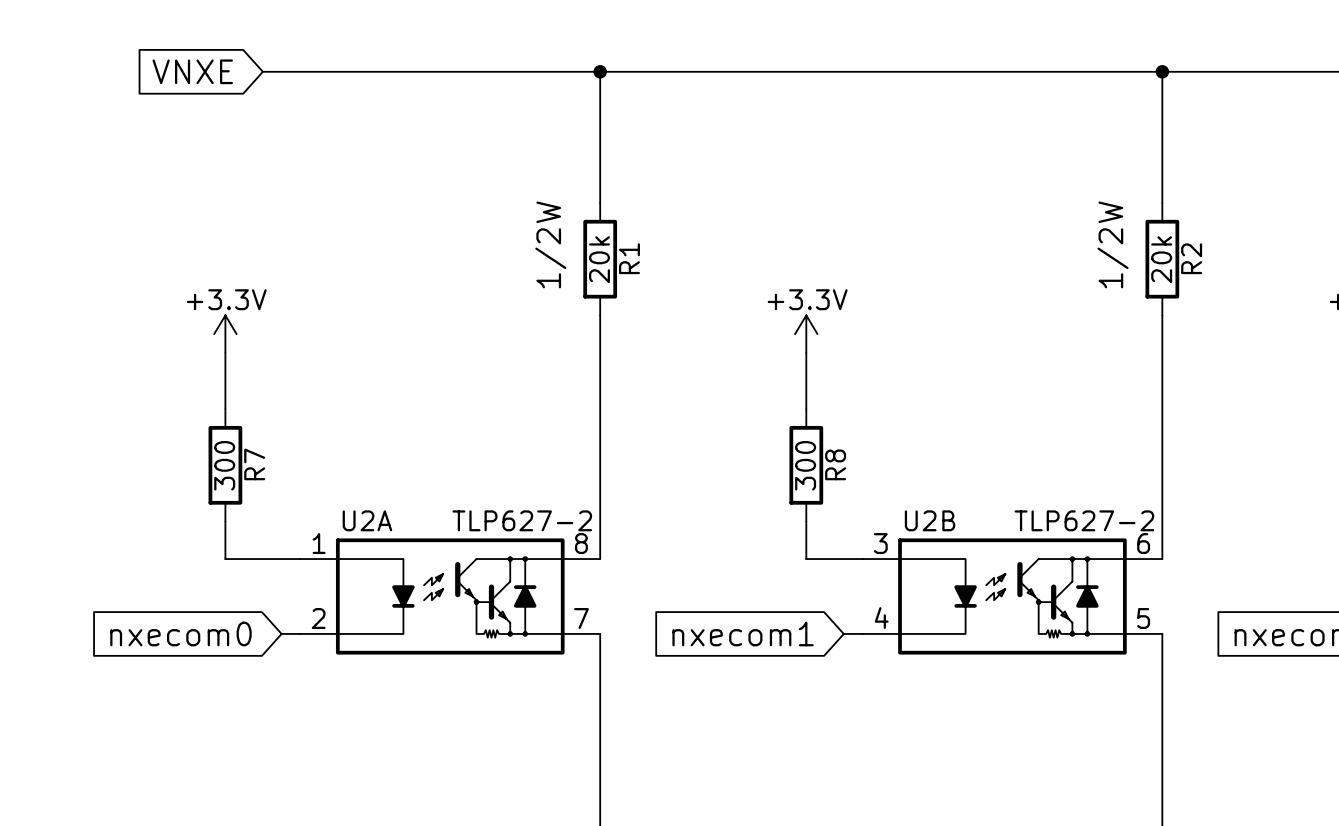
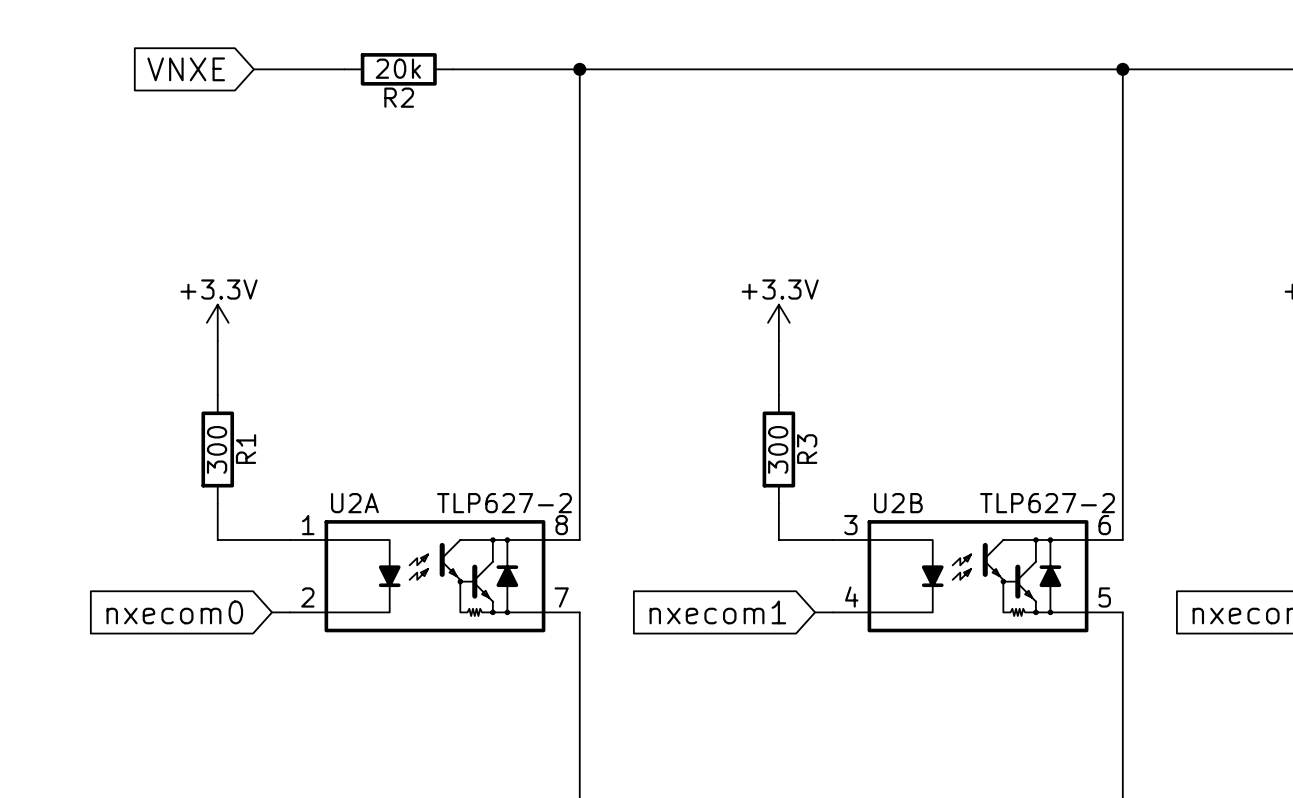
wire: (356, 71) (469, 71) -> none
wire: none -> (579, 196) (579, 304)
wire: none -> (1122, 196) (1122, 304)
text: 1/2W (550, 244) -> none
text: 1/2W (1113, 244) -> none
R1: 20k (600, 259) -> none
R2 rotation: 0° (1162, 259) -> 90° clockwise (398, 69)
R2 position: (1162, 259) -> (398, 69)
R7 name: R7 (254, 464) -> R1 (246, 449)
R8 name: R8 (835, 464) -> R3 (807, 449)

